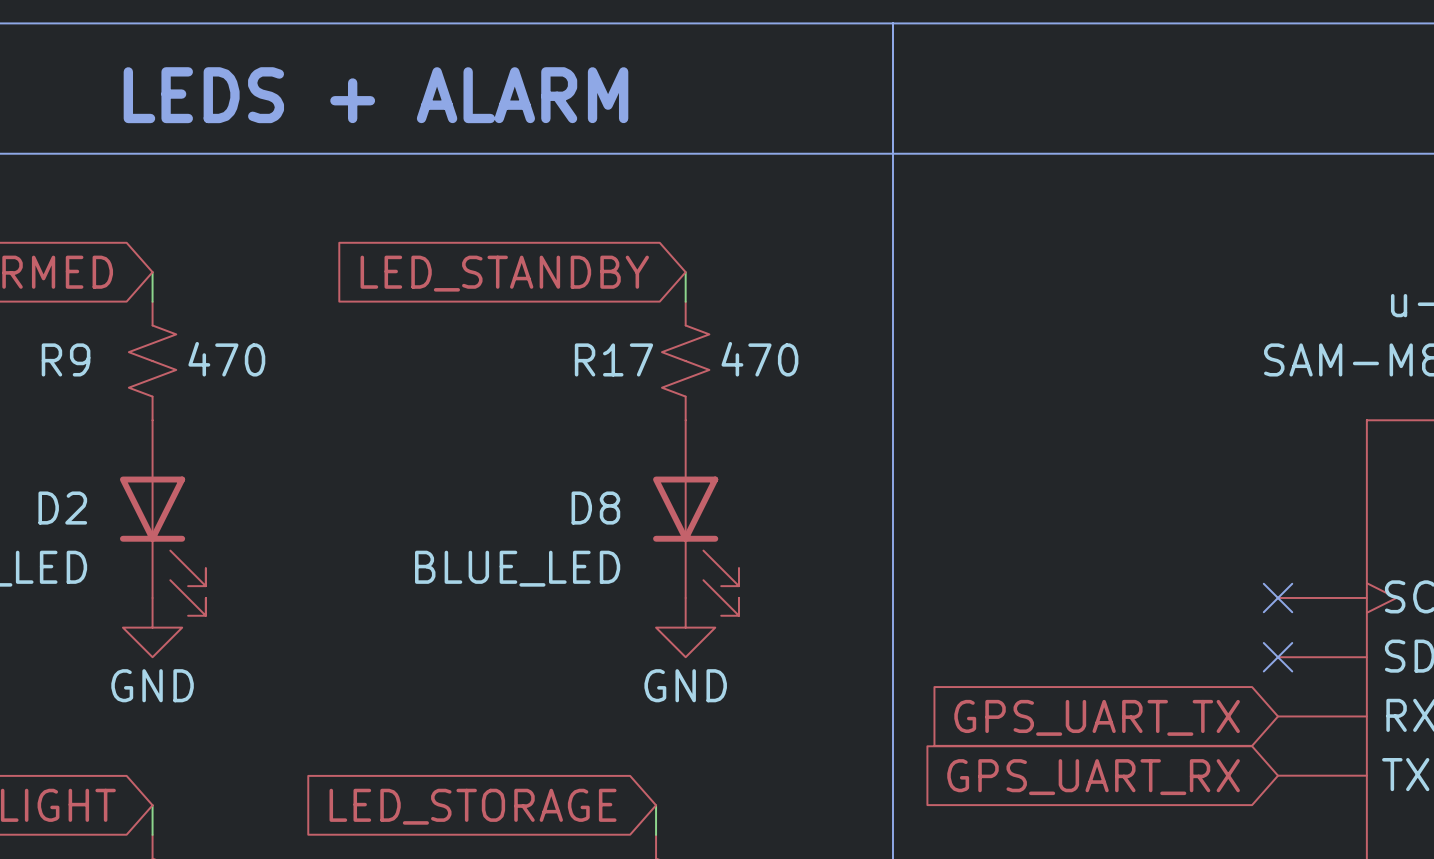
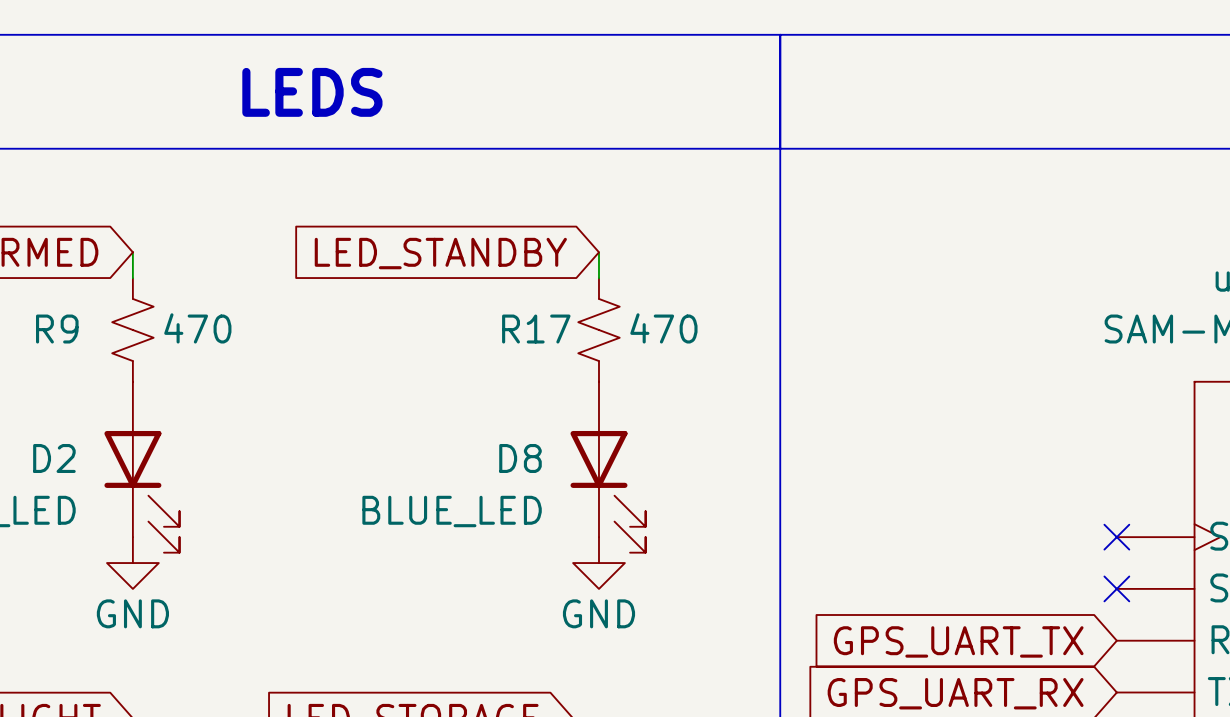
text: none -> LEDS (312, 92)
text: LEDS + ALARM (375, 95) -> none

